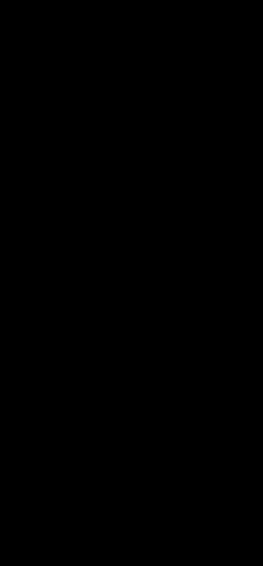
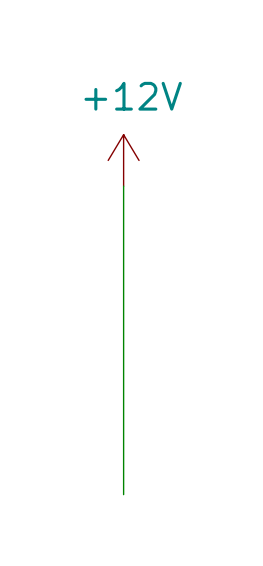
power symbol: none -> +12V (123, 160)
wire: none -> (123, 186) (123, 494)

